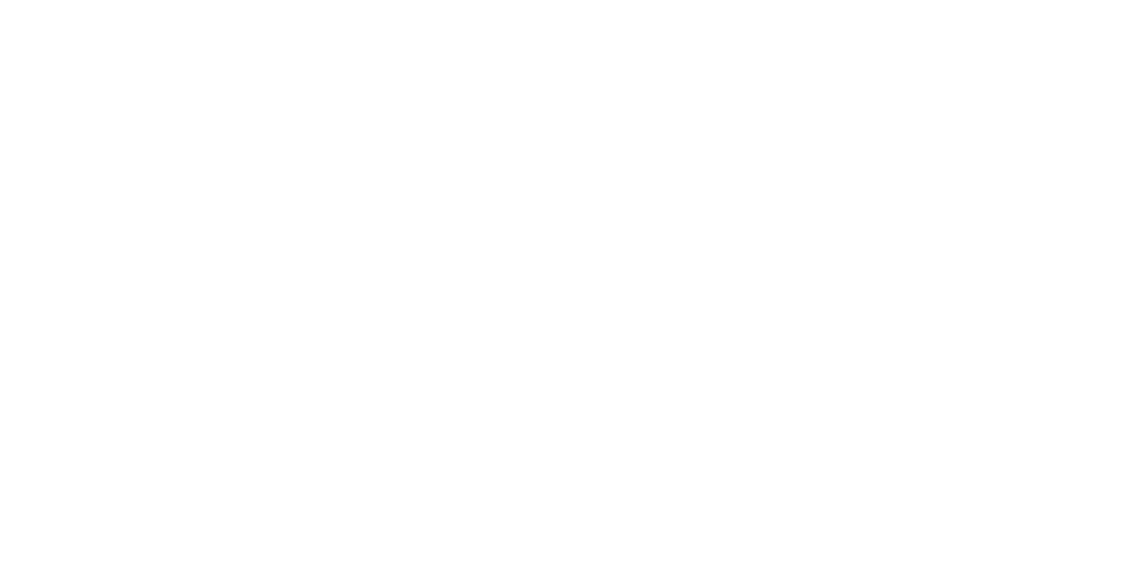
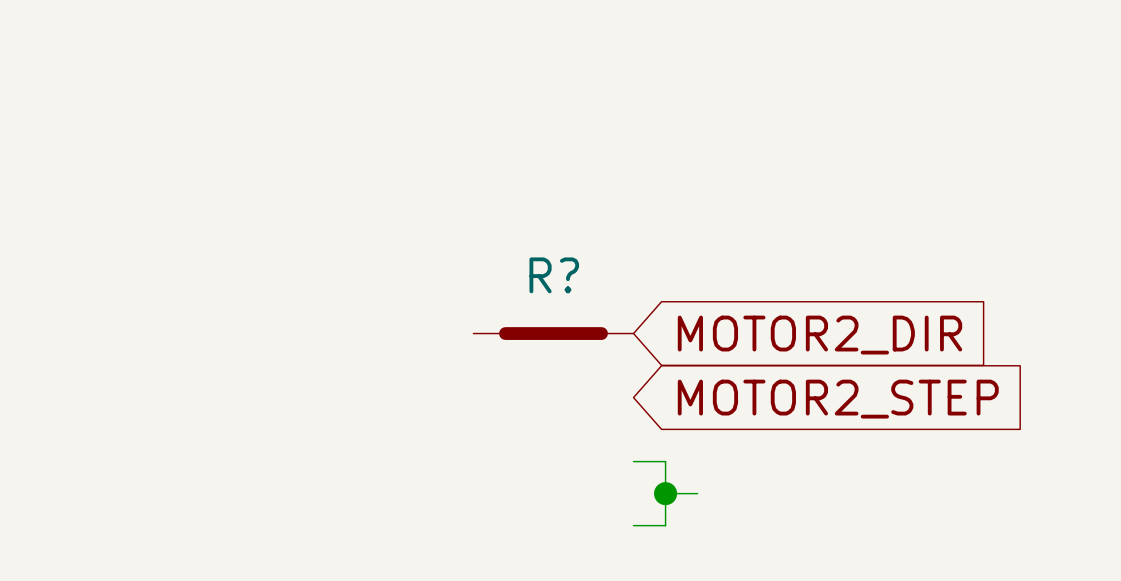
R?: none -> (553, 333)
global label: none -> MOTOR2_DIR (819, 335)
global label: none -> MOTOR2_STEP (838, 399)
wire: none -> (633, 461) (665, 461) (665, 525) (633, 525)
wire: none -> (665, 493) (697, 493)
junction: none -> (665, 493)

